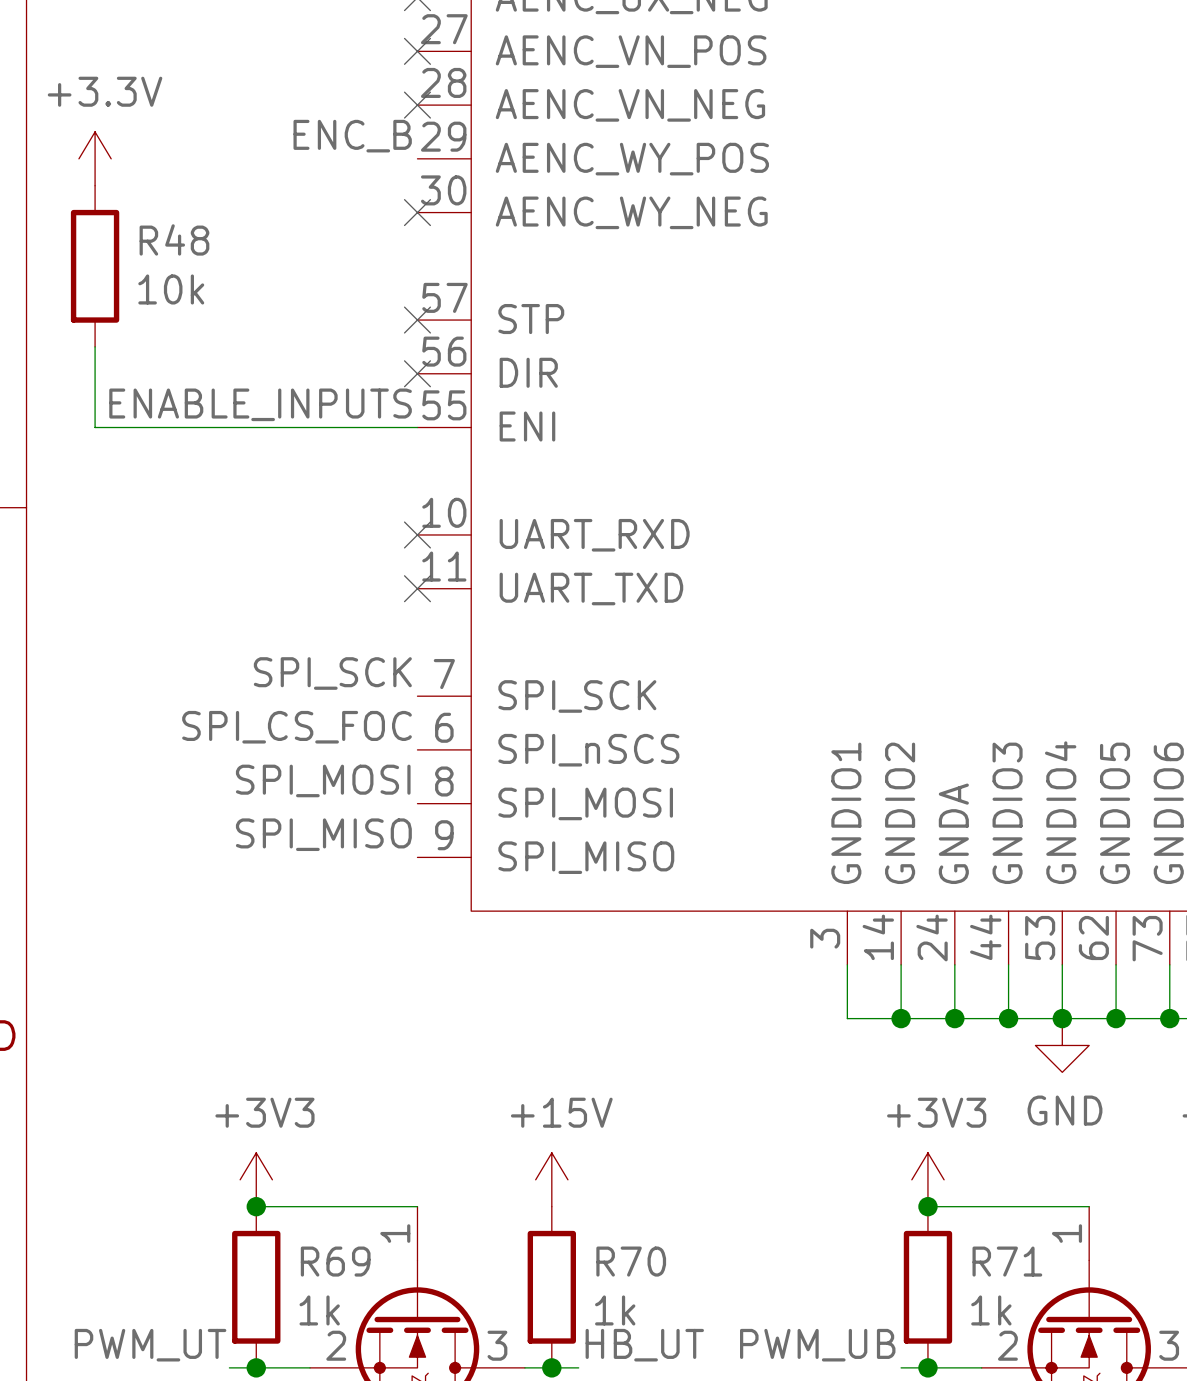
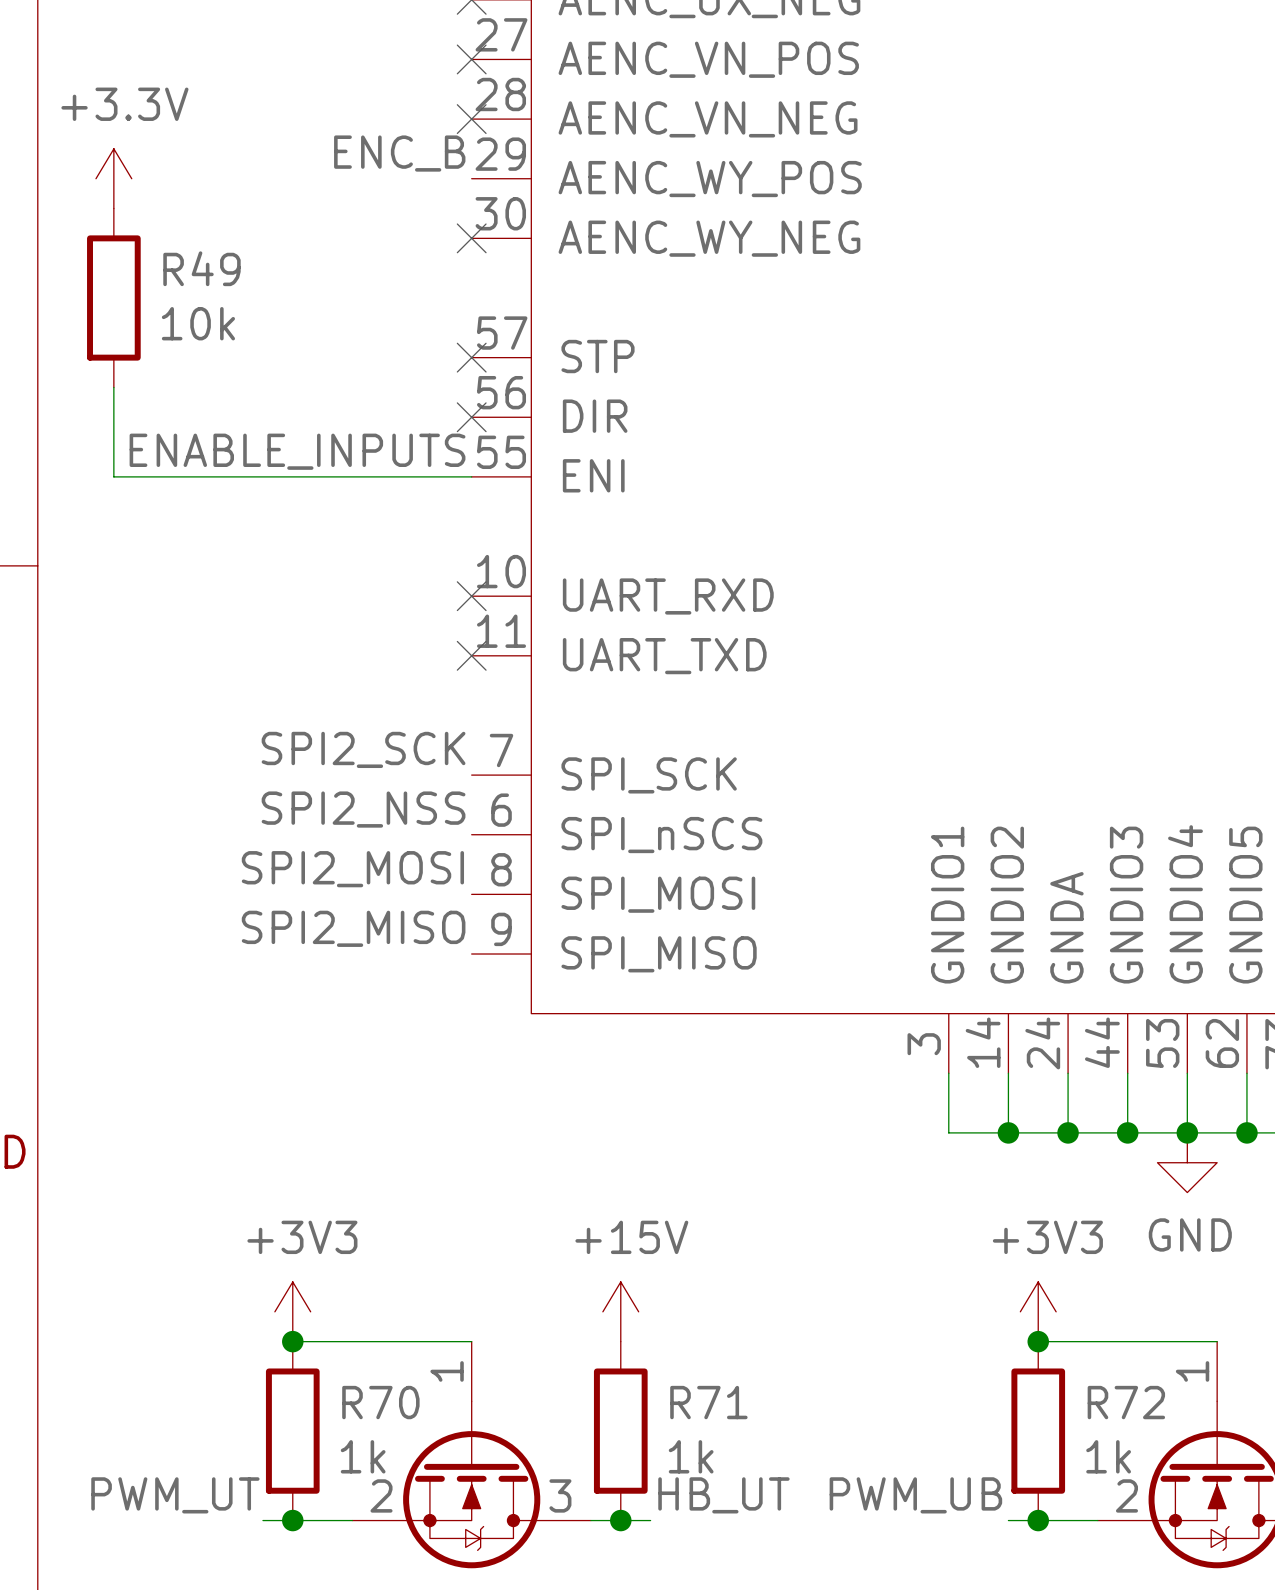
R48 name: R48 (174, 239) -> R49 (201, 268)
label: SPI_SCK (332, 673) -> SPI2_SCK (363, 749)
label: SPI_CS_FOC (297, 727) -> SPI2_NSS (363, 809)
label: SPI_MOSI (323, 780) -> SPI2_MOSI (352, 869)
label: SPI_MISO (323, 834) -> SPI2_MISO (353, 928)
R69 name: R69 (335, 1261) -> R70 (380, 1402)
R70 name: R70 (631, 1261) -> R71 (708, 1402)
R71 name: R71 (1007, 1261) -> R72 (1126, 1402)

